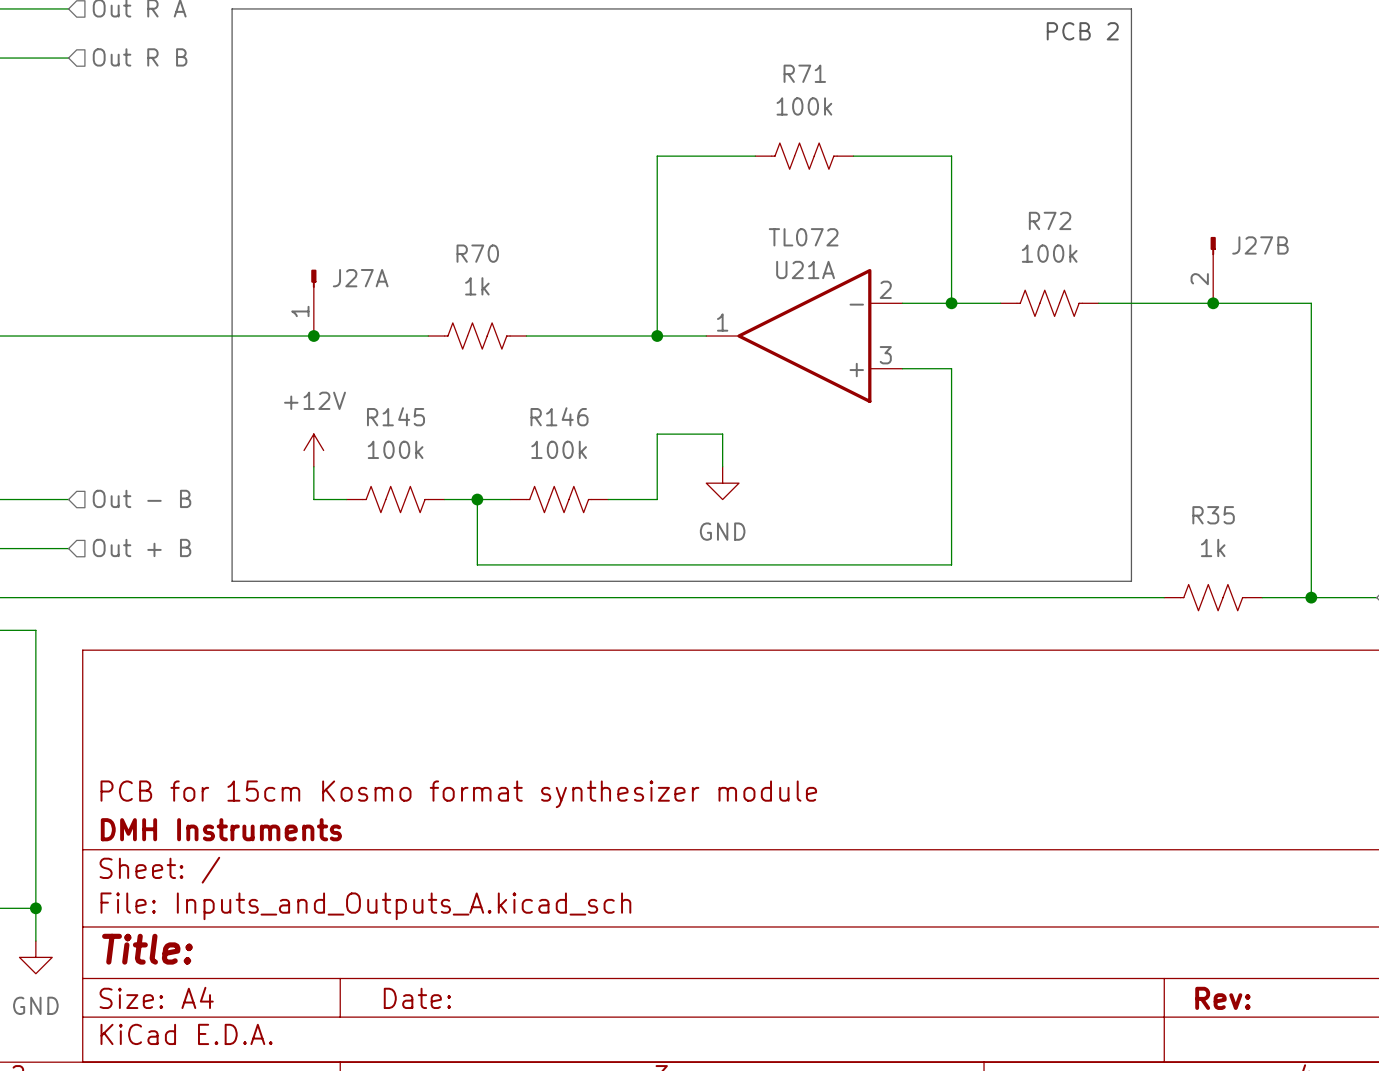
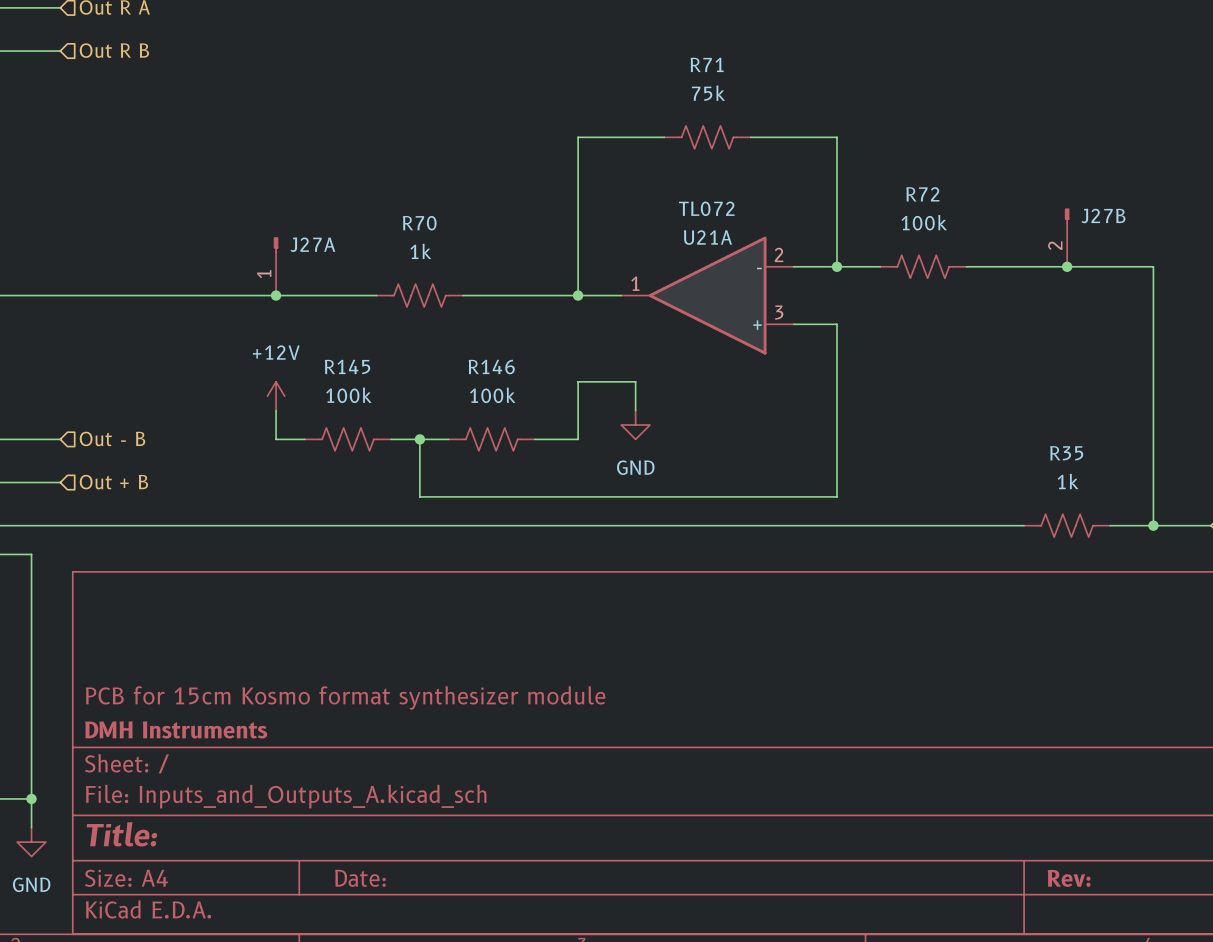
line: (232, 8) (1131, 8) (1131, 581) (232, 581) (232, 8) -> none
text: PCB 2 (1082, 31) -> none
R71 value: 100k (804, 106) -> 75k (708, 93)

